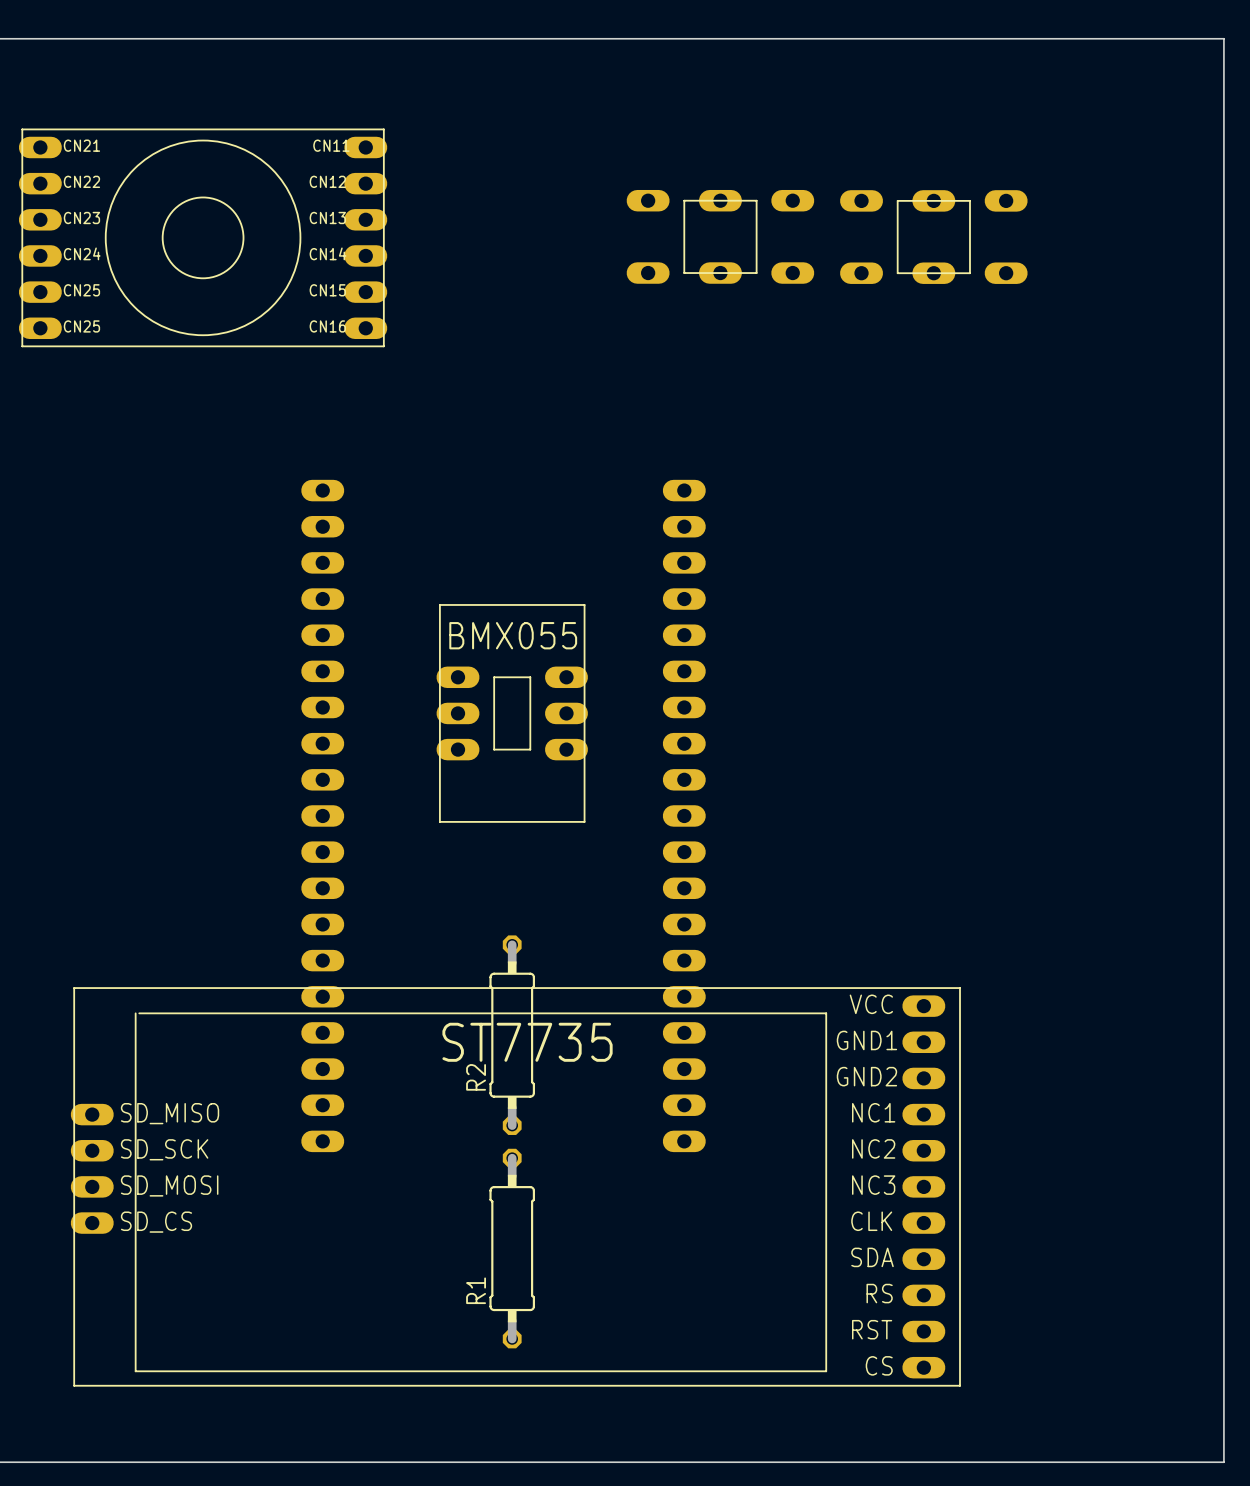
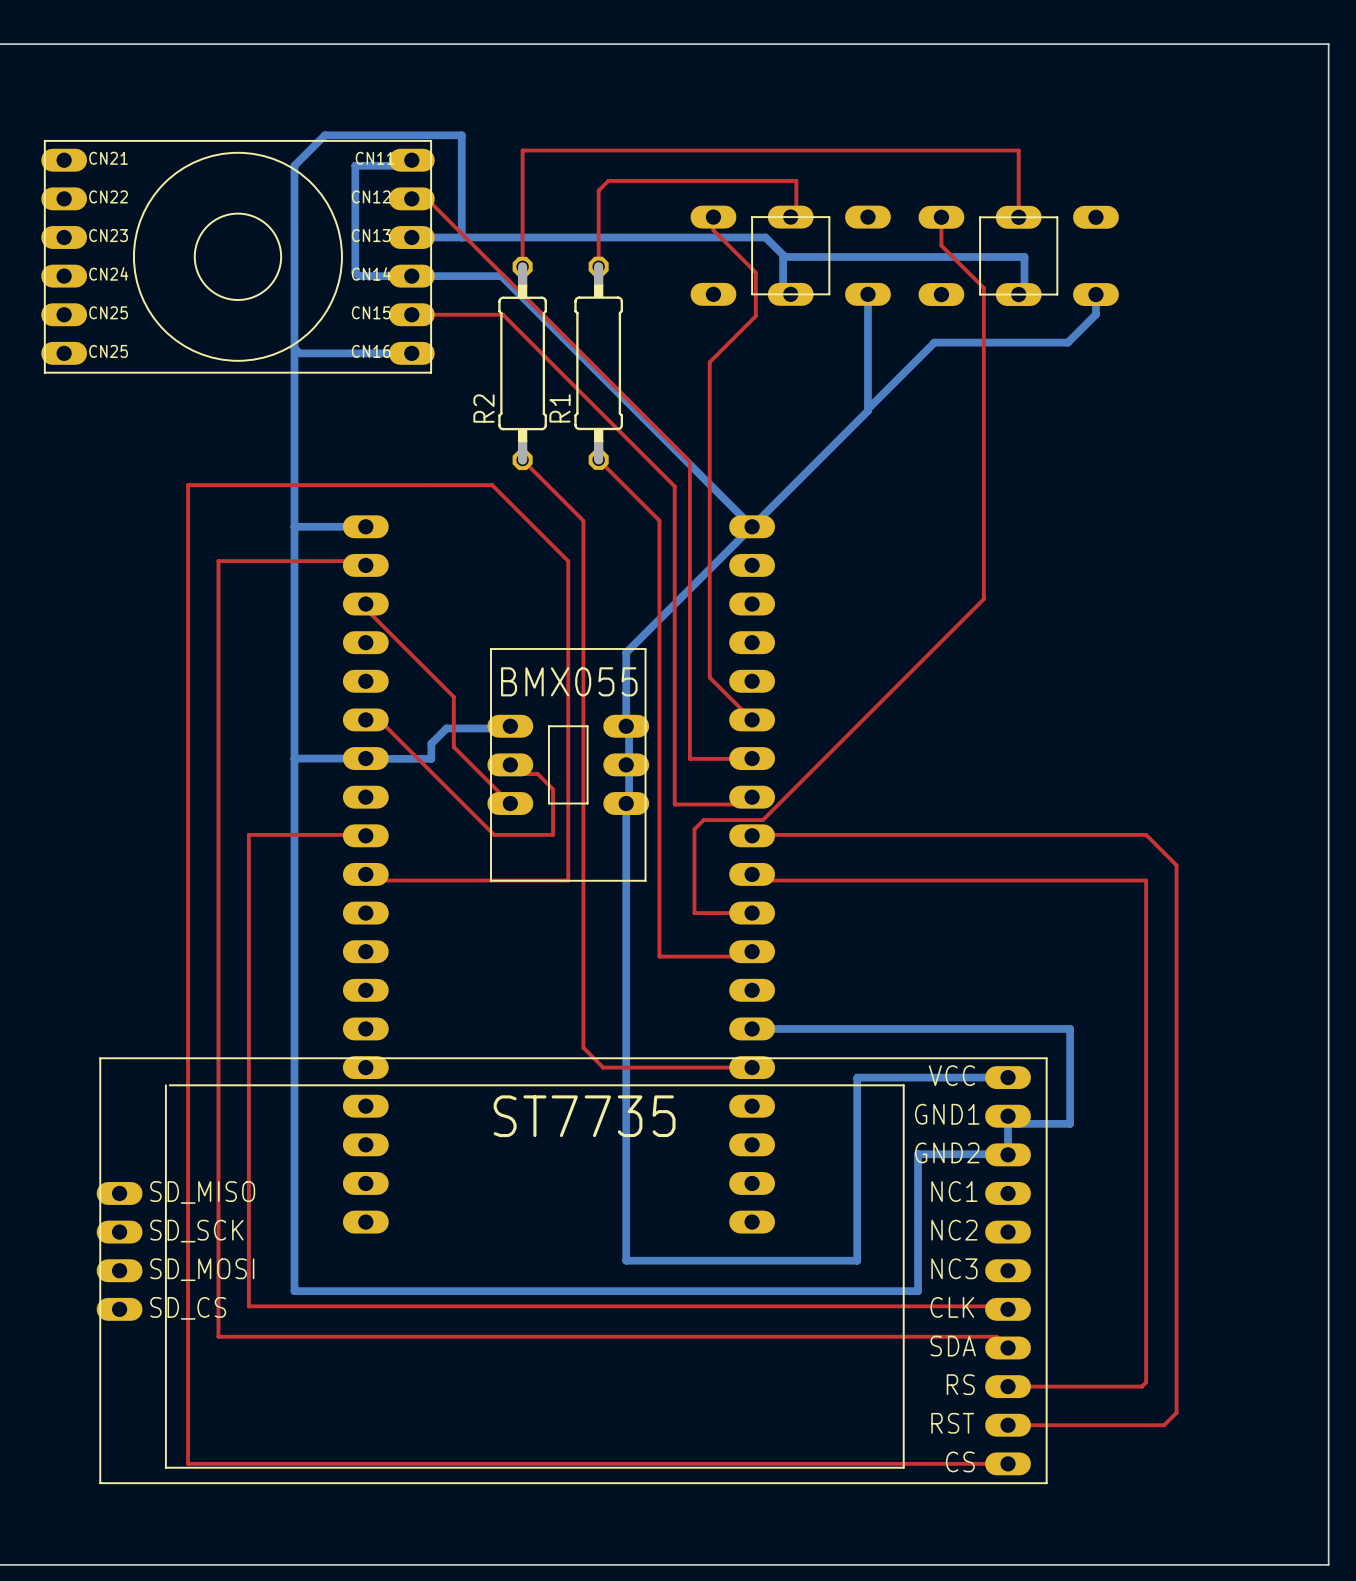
bottom track: none -> (411, 160) (406, 165) (355, 165) (355, 272) (359, 276) (501, 276) (752, 526)
top track: none -> (411, 198) (427, 198) (689, 461) (689, 758) (752, 758)
top track: none -> (713, 217) (713, 230) (755, 272) (755, 316) (709, 362) (709, 677) (752, 719)
top track: none -> (790, 217) (796, 211) (796, 180) (608, 180) (598, 190) (598, 266)
top track: none -> (941, 217) (941, 245) (983, 288) (983, 599) (762, 820) (703, 820) (694, 829) (694, 913) (752, 913)
top track: none -> (1018, 217) (1018, 150) (522, 150) (522, 266)
bottom track: none -> (411, 237) (765, 237) (785, 256) (1024, 256) (1024, 288) (1018, 294)
bottom track: none -> (461, 237) (461, 135) (324, 135) (294, 165) (294, 1291) (918, 1291) (918, 1154) (1008, 1154)
bottom track: none -> (783, 255) (783, 286) (790, 294)
bottom track: none -> (867, 294) (867, 410) (626, 652) (626, 726) (629, 729) (629, 800) (626, 803) (626, 1260) (857, 1260) (857, 1078) (1008, 1077)
bottom track: none -> (1095, 294) (1095, 314) (1067, 342) (934, 342) (867, 409)
top track: none -> (411, 314) (503, 314) (674, 486) (674, 804) (744, 804) (752, 797)
bottom track: none -> (294, 348) (299, 353) (411, 353)
top track: none -> (598, 459) (659, 520) (659, 956) (747, 956) (752, 951)
top track: none -> (522, 460) (583, 520) (583, 1047) (603, 1067) (752, 1067)
bottom track: none -> (294, 526) (365, 526)
top track: none -> (365, 565) (361, 561) (218, 561) (218, 1336) (996, 1336) (1008, 1347)
top track: none -> (365, 604) (370, 606) (370, 613) (453, 696) (453, 747) (510, 803)
top track: none -> (365, 719) (372, 713) (494, 834) (553, 834) (553, 789) (537, 774) (519, 774) (510, 764)
bottom track: none -> (510, 726) (508, 728) (446, 728) (431, 743) (431, 758) (294, 758)
top track: none -> (365, 835) (248, 834) (248, 1306) (1005, 1306) (1008, 1309)
top track: none -> (752, 835) (1146, 834) (1176, 865) (1176, 1412) (1164, 1425) (1008, 1425)
top track: none -> (365, 874) (371, 880) (568, 880) (568, 561) (492, 485) (188, 485) (188, 1463) (1008, 1463)
top track: none -> (752, 874) (758, 880) (1146, 880) (1146, 1382) (1141, 1386) (1008, 1386)
bottom track: none -> (752, 1028) (1070, 1028) (1070, 1123) (1015, 1123) (1008, 1116) (1008, 1154)
R2 position: (512, 1035) -> (522, 363)
R1 position: (512, 1248) -> (598, 363)

